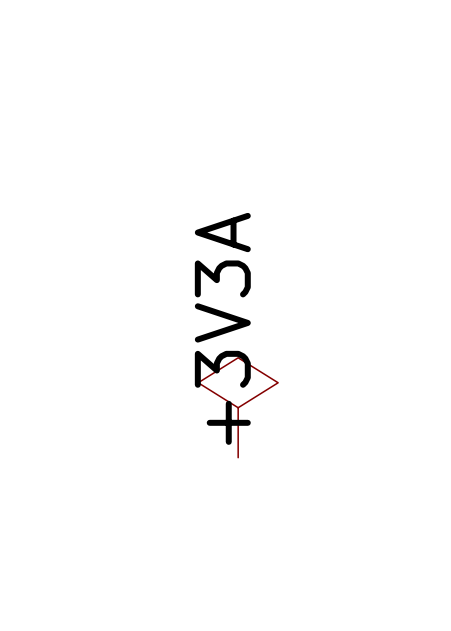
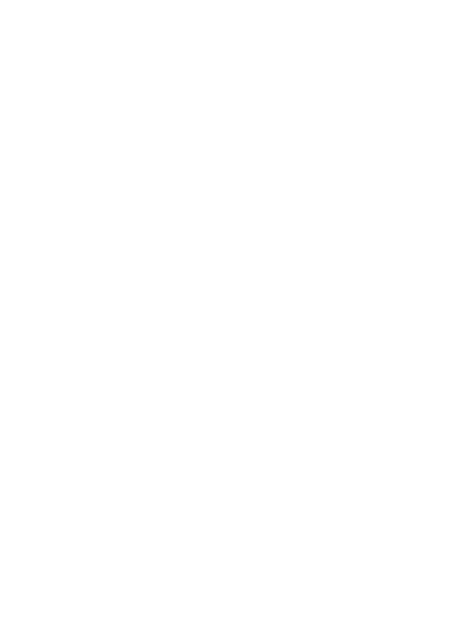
label: +3V3A (222, 328) -> none
power symbol: (238, 407) -> none

